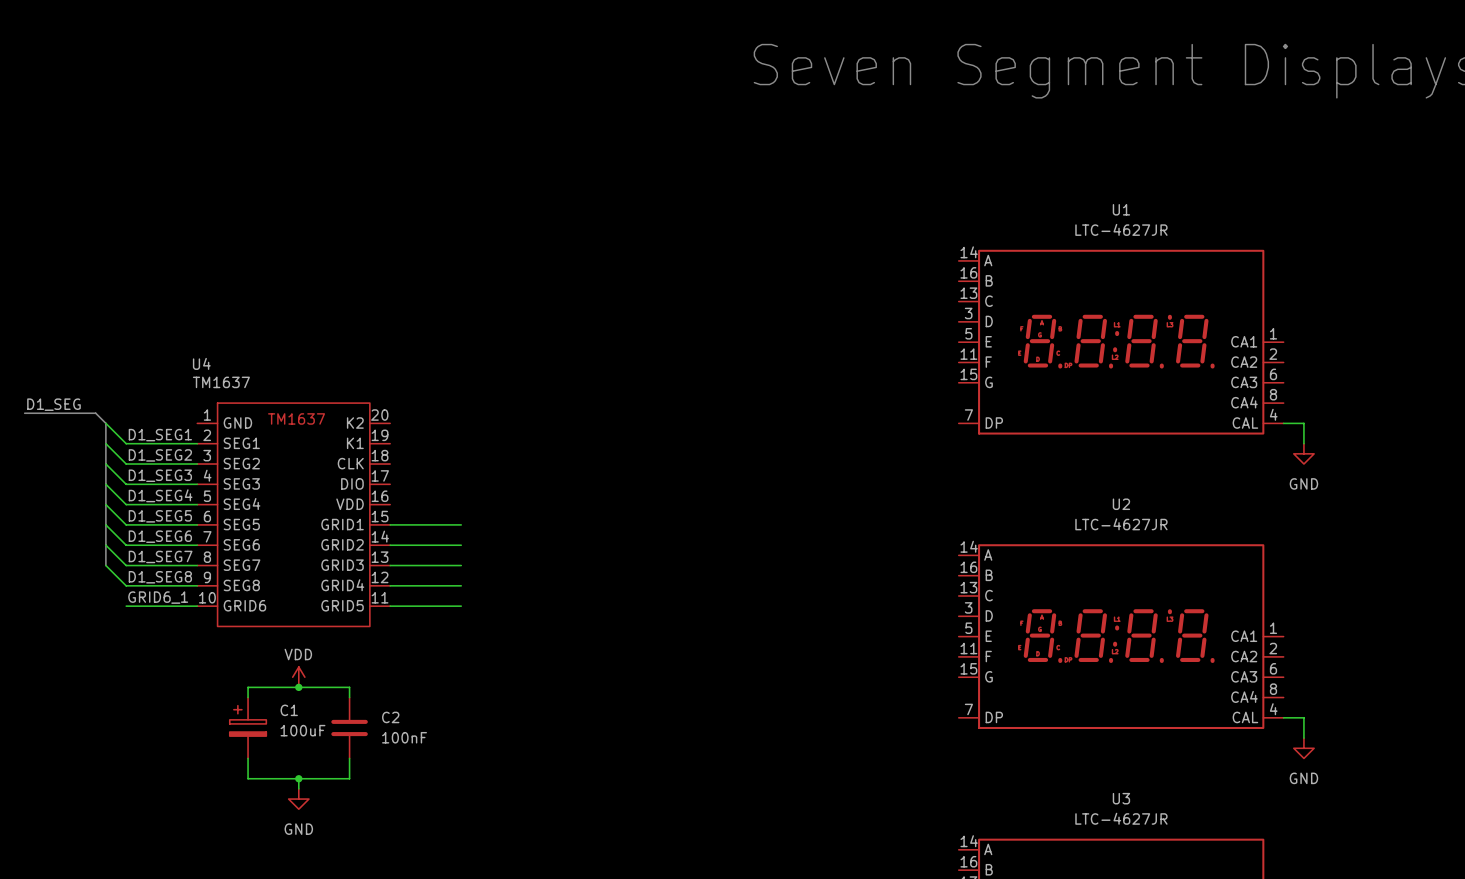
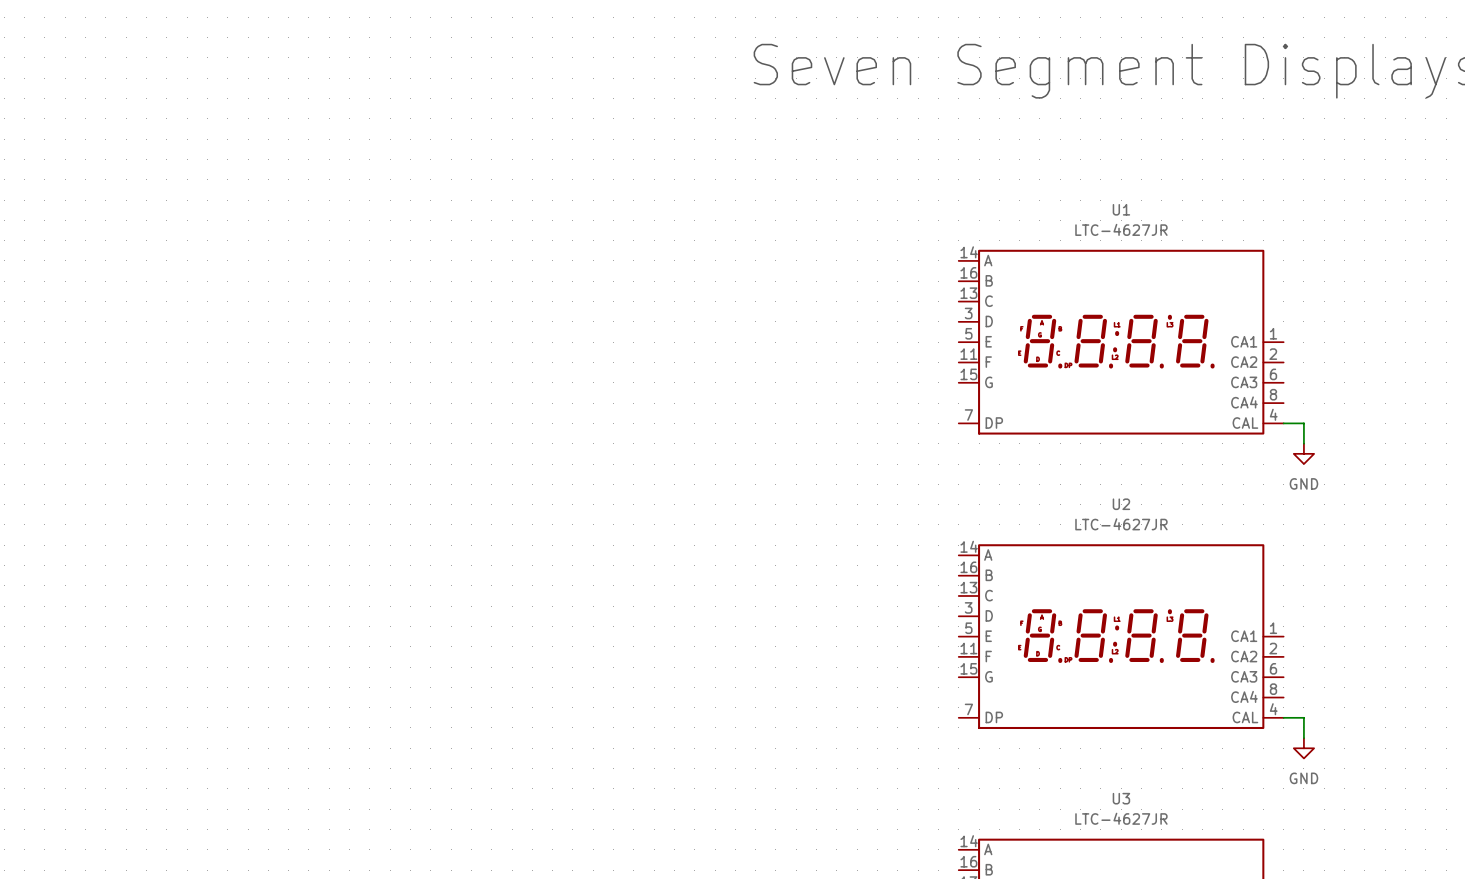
label: D1_SEG (54, 404) -> none
bus: (24, 413) (95, 413) (105, 423) (105, 565) -> none
wire: (105, 423) (126, 443) (197, 443) -> none
label: D1_SEG1 (160, 435) -> none
wire: (105, 443) (126, 464) (197, 464) -> none
label: D1_SEG2 (160, 455) -> none
wire: (105, 464) (126, 484) (197, 484) -> none
label: D1_SEG3 (160, 475) -> none
wire: (105, 484) (126, 504) (197, 504) -> none
label: D1_SEG4 (160, 495) -> none
wire: (105, 504) (126, 524) (197, 524) -> none
U4: TM1637 (293, 514) -> none
label: D1_SEG5 (160, 516) -> none
wire: (105, 524) (126, 545) (197, 545) -> none
wire: (390, 524) (461, 524) -> none
label: D1_SEG6 (160, 536) -> none
wire: (105, 545) (126, 565) (197, 565) -> none
wire: (390, 545) (461, 545) -> none
label: D1_SEG7 (160, 556) -> none
wire: (105, 565) (126, 585) (197, 585) -> none
wire: (390, 565) (461, 565) -> none
label: D1_SEG8 (160, 577) -> none
wire: (390, 585) (461, 585) -> none
label: GRID6_1 (158, 597) -> none
wire: (126, 606) (197, 606) -> none
wire: (390, 606) (461, 606) -> none
power symbol: VDD (298, 677) -> none
junction: (298, 687) -> none
wire: (248, 697) (248, 687) (349, 687) (349, 697) -> none
C1: 100uF (248, 727) -> none
C2: 100nF (349, 727) -> none
wire: (248, 758) (248, 778) (349, 778) (349, 758) -> none
wire: (298, 778) (298, 788) -> none
junction: (298, 778) -> none
power symbol: GND (298, 799) -> none

